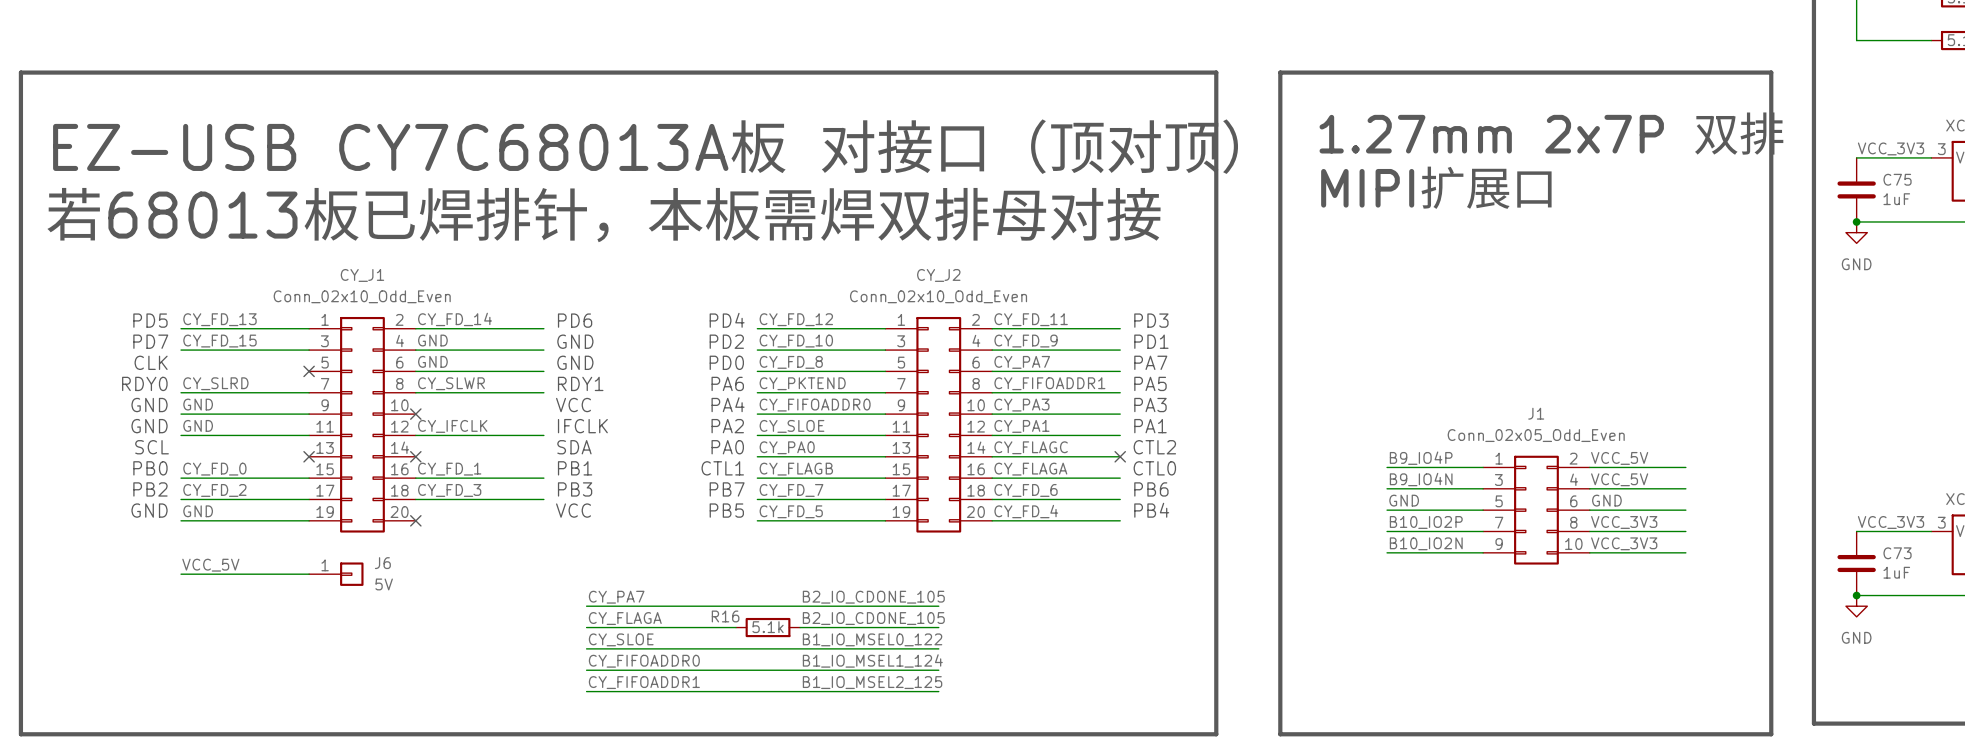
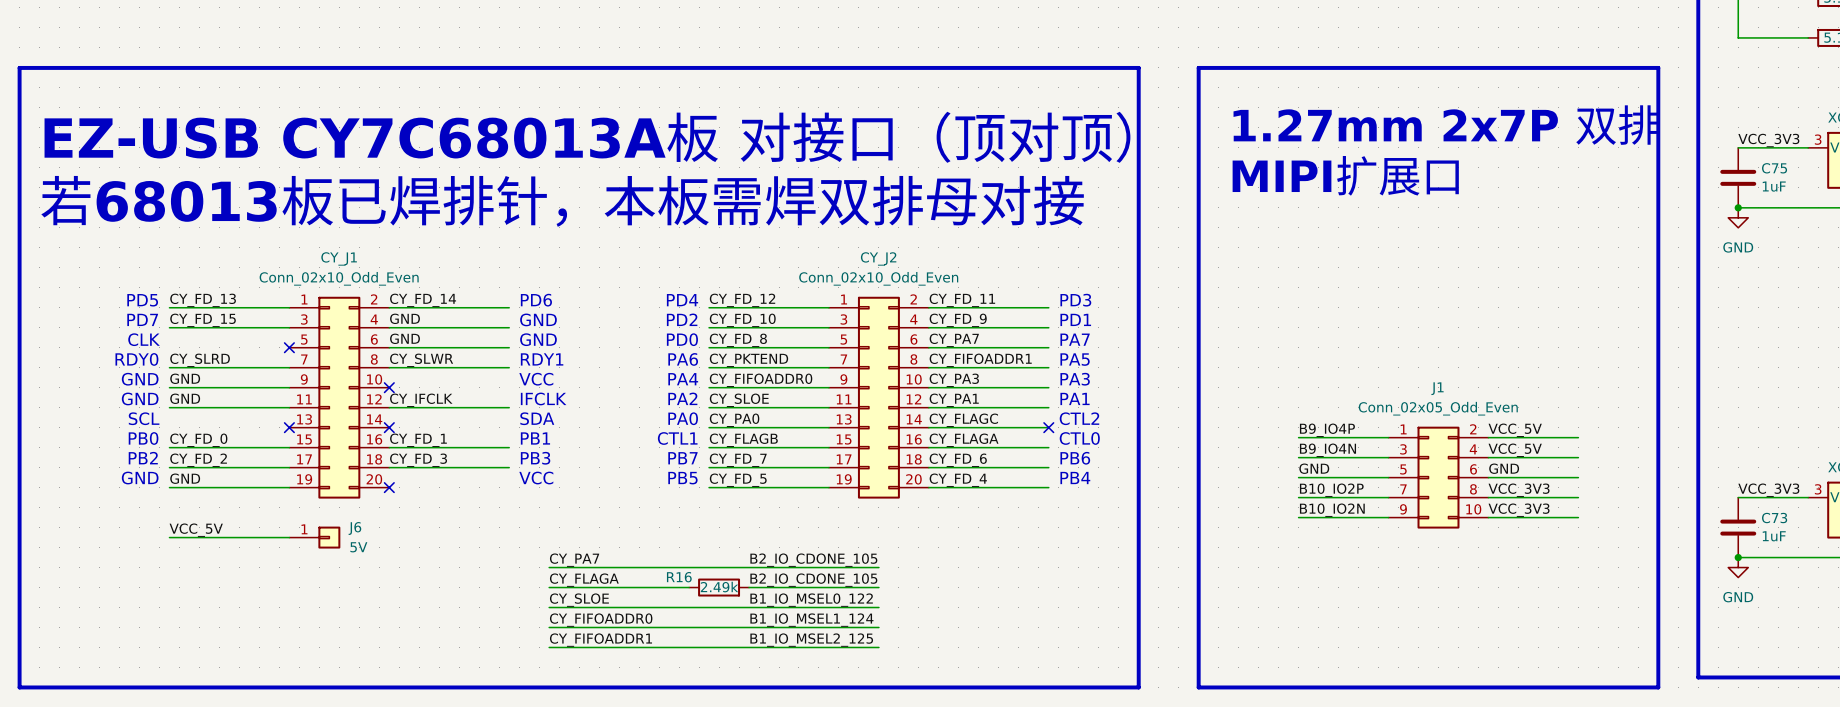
R16 value: 5.1k (768, 627) -> 2.49k (719, 587)

